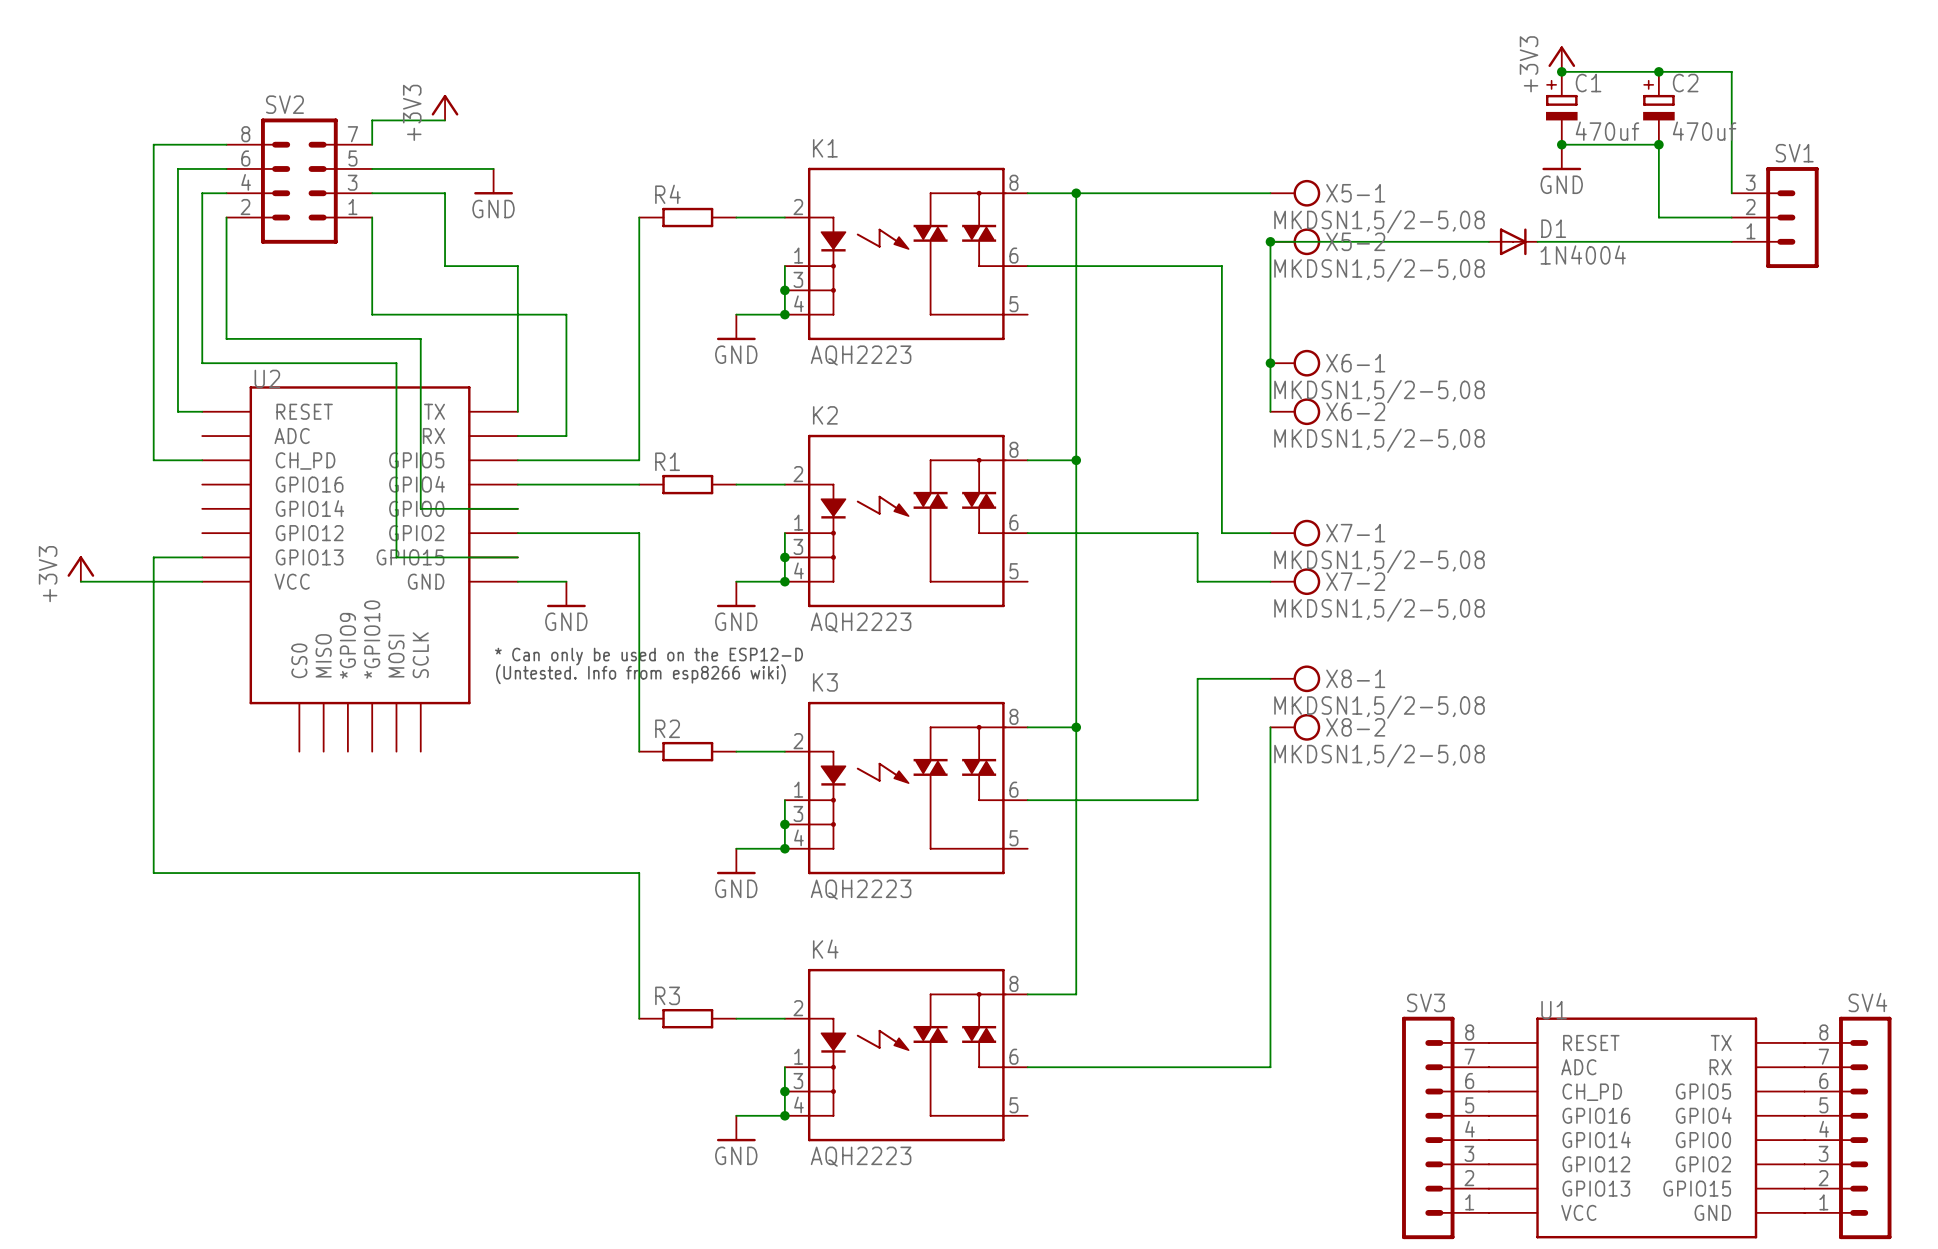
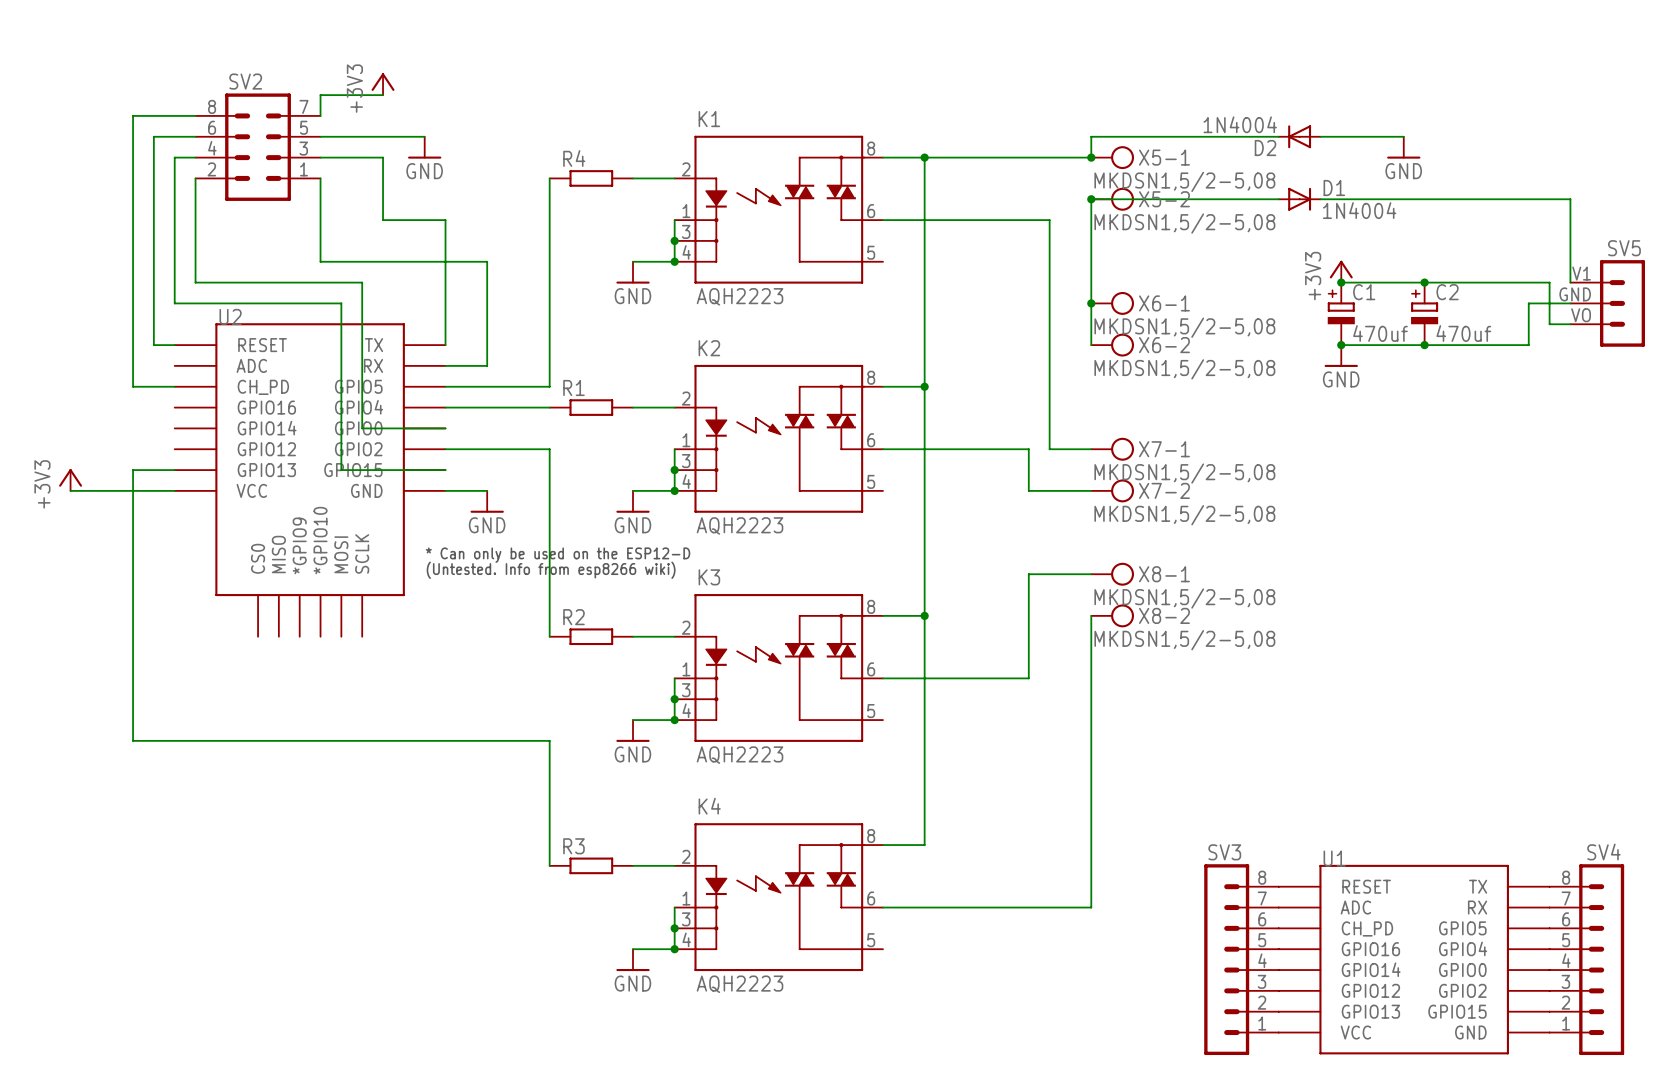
power symbol: +3V3 (1561, 59) -> none
wire: (1561, 71) (1731, 71) (1731, 193) -> none
junction: (1561, 71) -> none
junction: (1658, 71) -> none
C1 position: (1561, 108) -> (1341, 313)
C2 position: (1658, 108) -> (1424, 313)
wire: (1561, 144) (1658, 144) (1658, 217) (1731, 217) -> none
junction: (1561, 144) -> none
junction: (1658, 144) -> none
power symbol position: GND (1561, 157) -> GND (1403, 147)
wire: none -> (1278, 136) (1091, 136) (1091, 157)
D2: none -> 1N4004 (1299, 136)
wire: none -> (1320, 136) (1403, 136)
junction: none -> (1091, 157)
SV1: (1775, 217) -> none
wire: none -> (1487, 199) (1570, 199) (1570, 282)
power symbol: none -> +3V3 (1341, 271)
wire: none -> (1341, 282) (1549, 282) (1549, 324) (1570, 324)
junction: none -> (1341, 282)
junction: none -> (1424, 282)
wire: none -> (1570, 303) (1528, 303) (1528, 345) (1341, 345)
SV5: none -> (1607, 303)
junction: none -> (1341, 345)
junction: none -> (1424, 345)
power symbol: none -> GND (1341, 356)

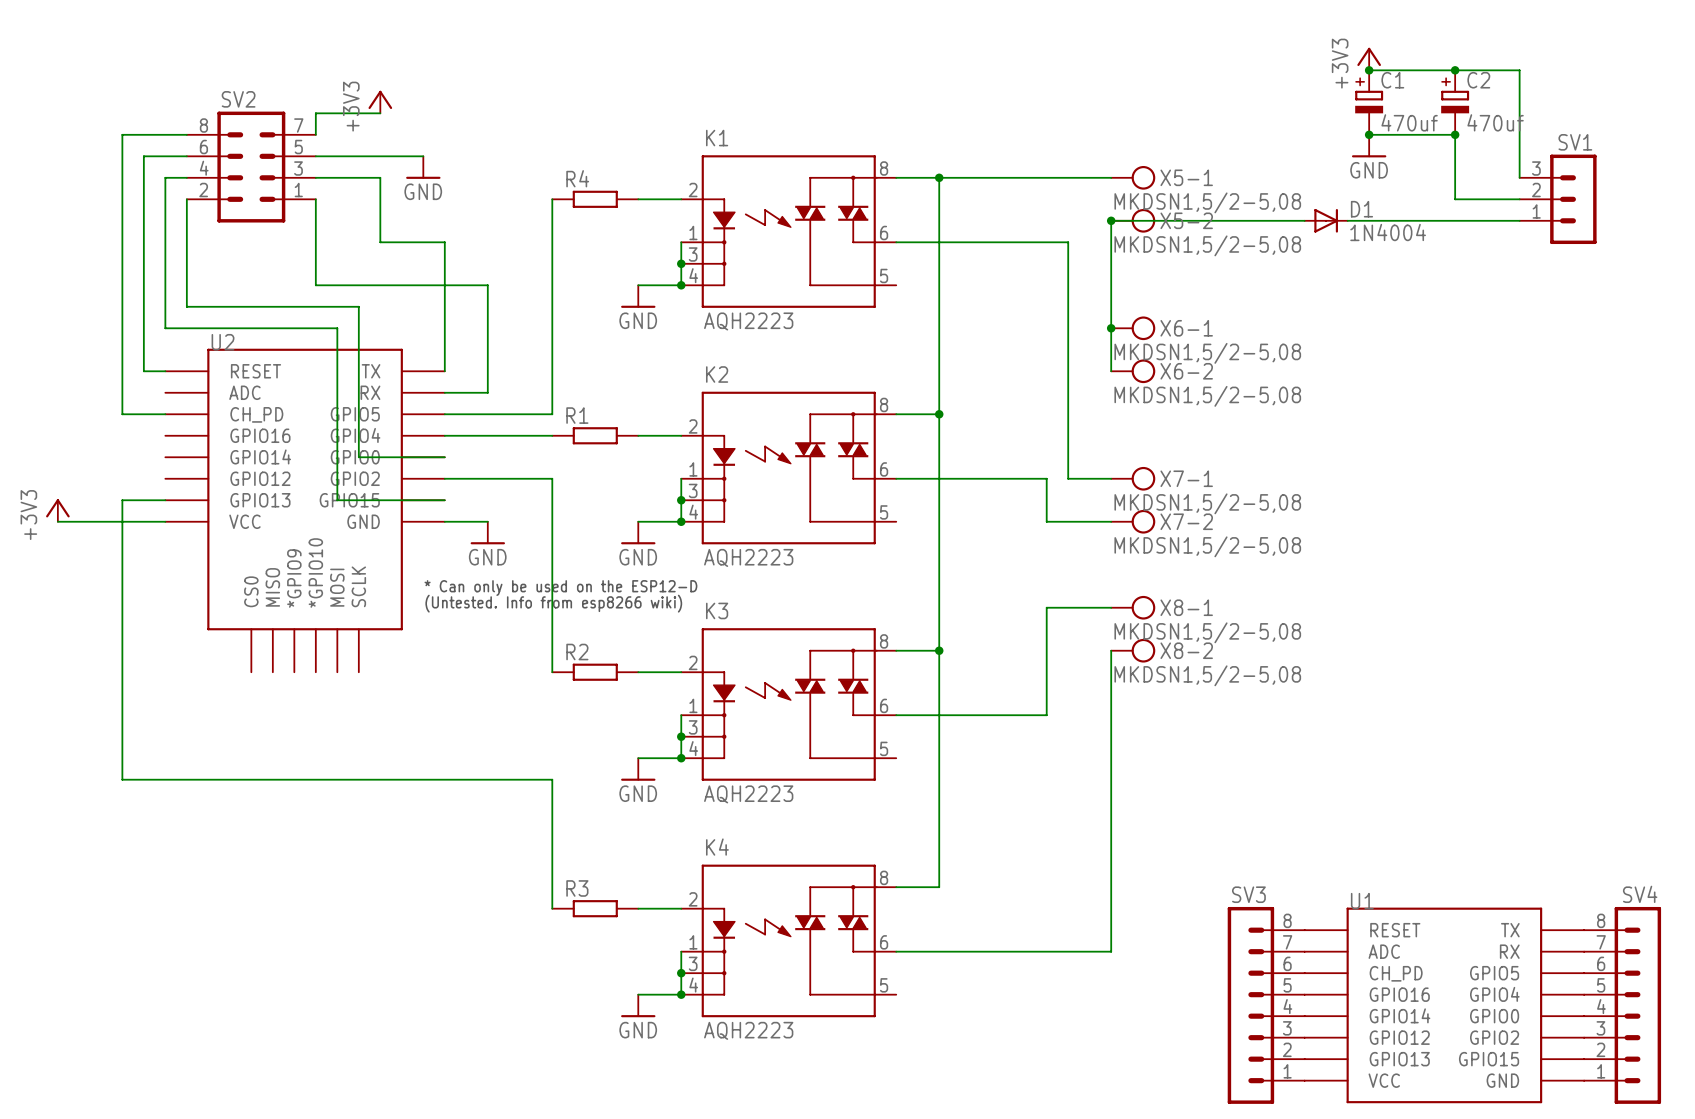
power symbol: none -> +3V3 (1369, 59)
wire: none -> (1369, 70) (1519, 70) (1519, 177)
junction: none -> (1369, 70)
junction: none -> (1455, 70)
wire: none -> (1369, 134) (1455, 134) (1455, 199) (1519, 199)
junction: none -> (1369, 134)
junction: none -> (1455, 134)
wire: (1278, 136) (1091, 136) (1091, 157) -> none
D2: 1N4004 (1299, 136) -> none
wire: (1320, 136) (1403, 136) -> none
power symbol position: GND (1403, 147) -> GND (1369, 146)
junction: (1091, 157) -> none
SV1: none -> (1558, 199)
wire: (1487, 199) (1570, 199) (1570, 282) -> none
power symbol: +3V3 (1341, 271) -> none
wire: (1341, 282) (1549, 282) (1549, 324) (1570, 324) -> none
junction: (1341, 282) -> none
junction: (1424, 282) -> none
wire: (1570, 303) (1528, 303) (1528, 345) (1341, 345) -> none
SV5: (1607, 303) -> none
C1 position: (1341, 313) -> (1369, 102)
C2 position: (1424, 313) -> (1455, 102)
junction: (1341, 345) -> none
junction: (1424, 345) -> none
power symbol: GND (1341, 356) -> none

